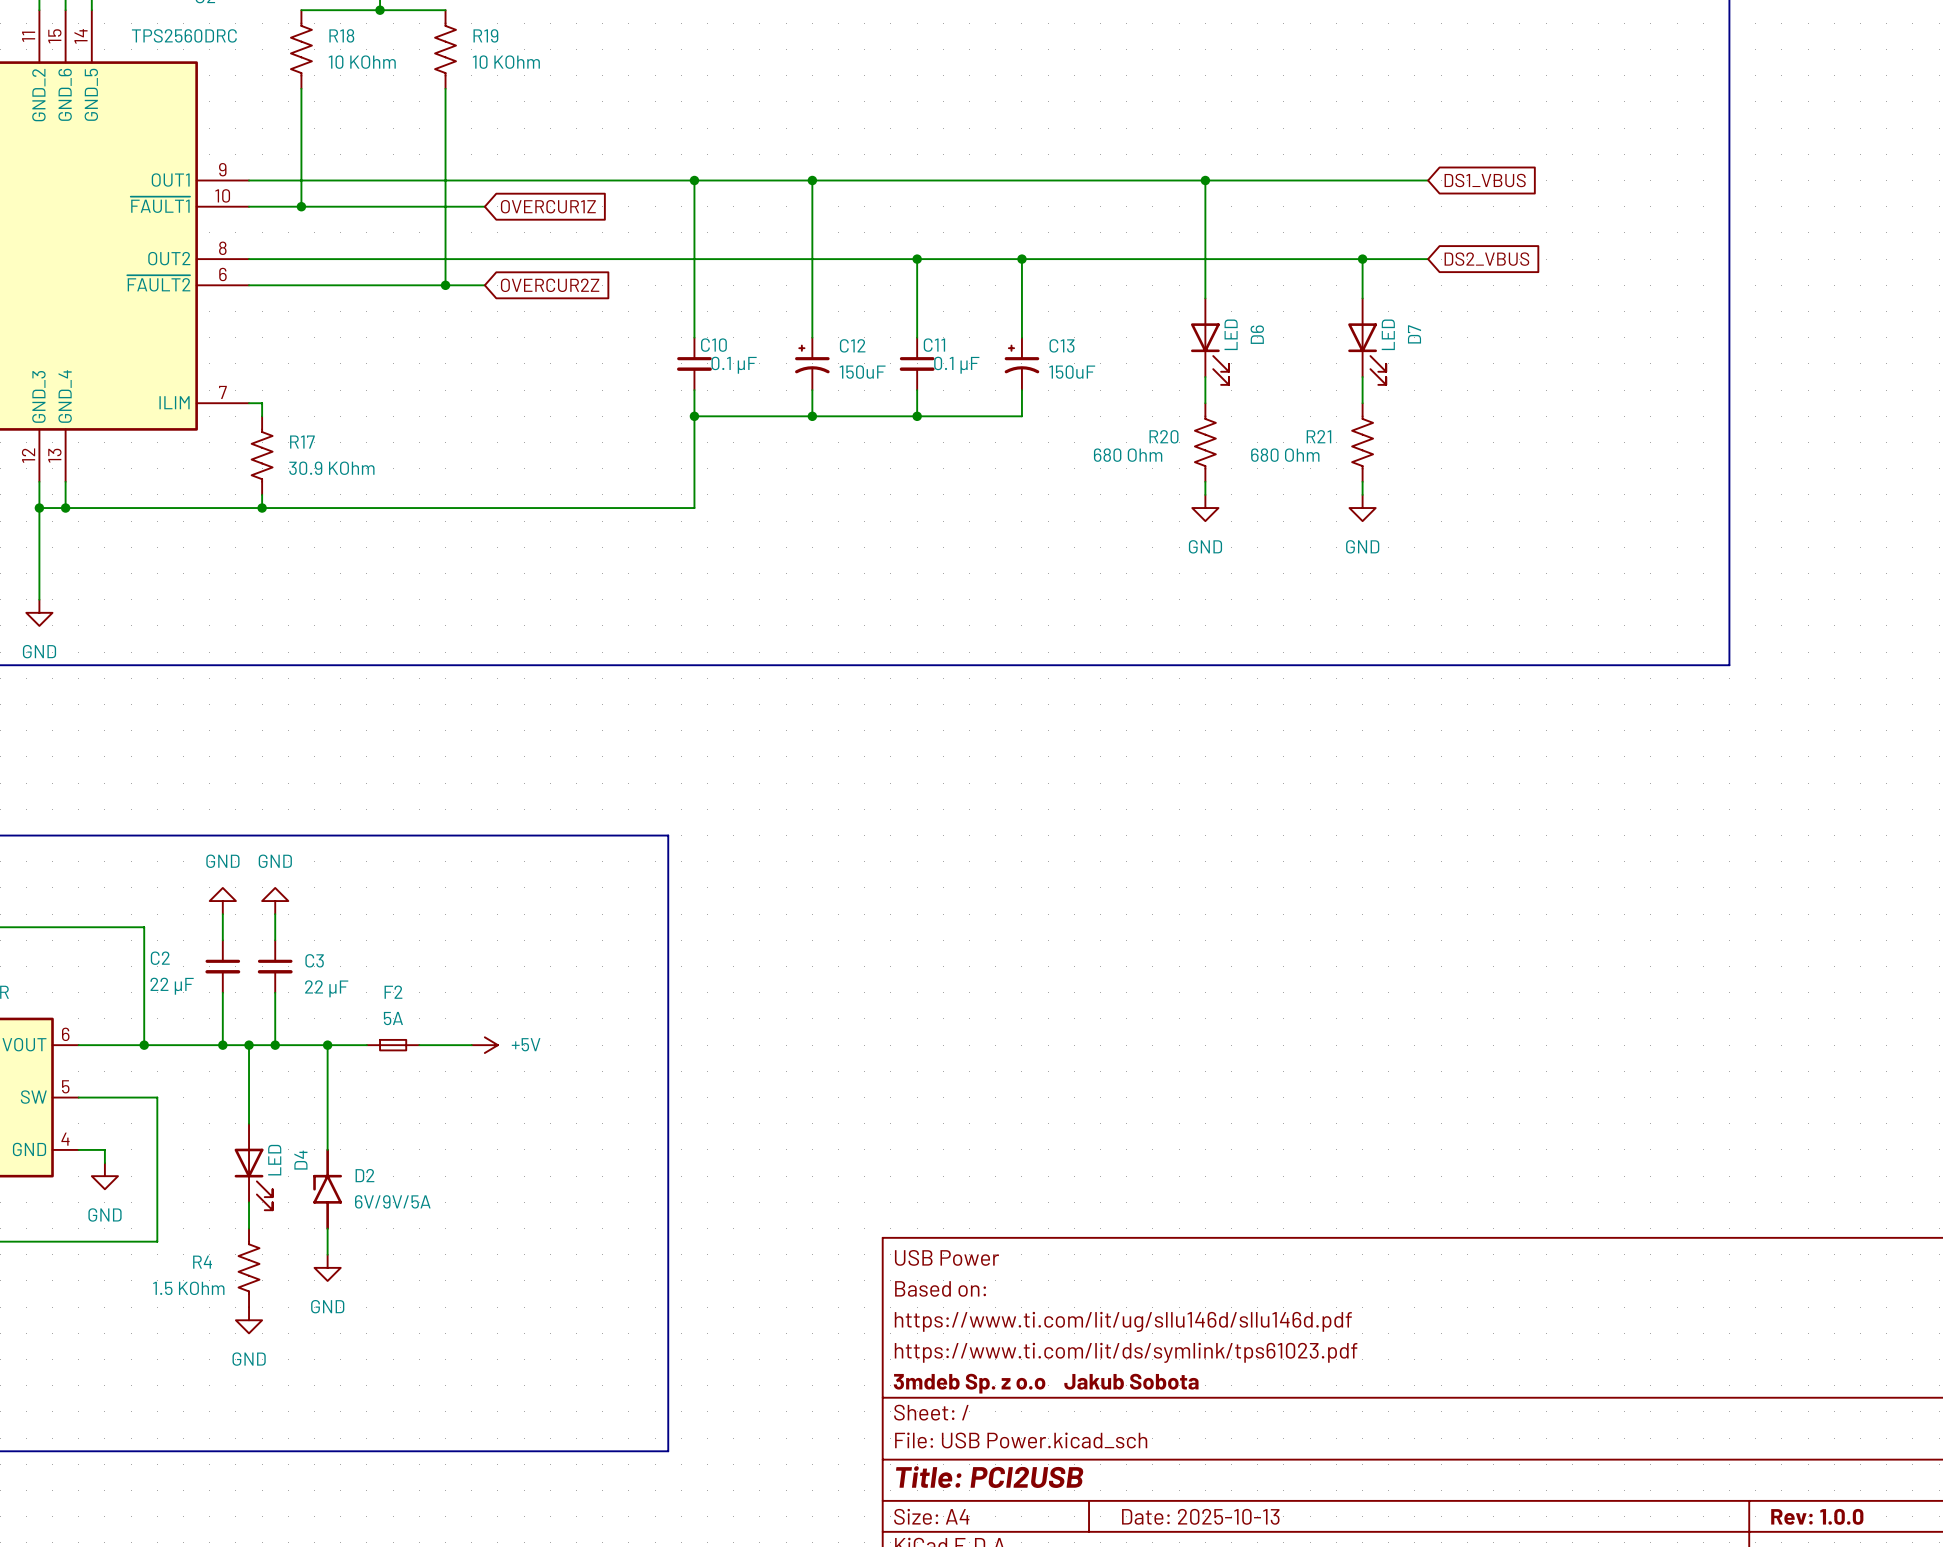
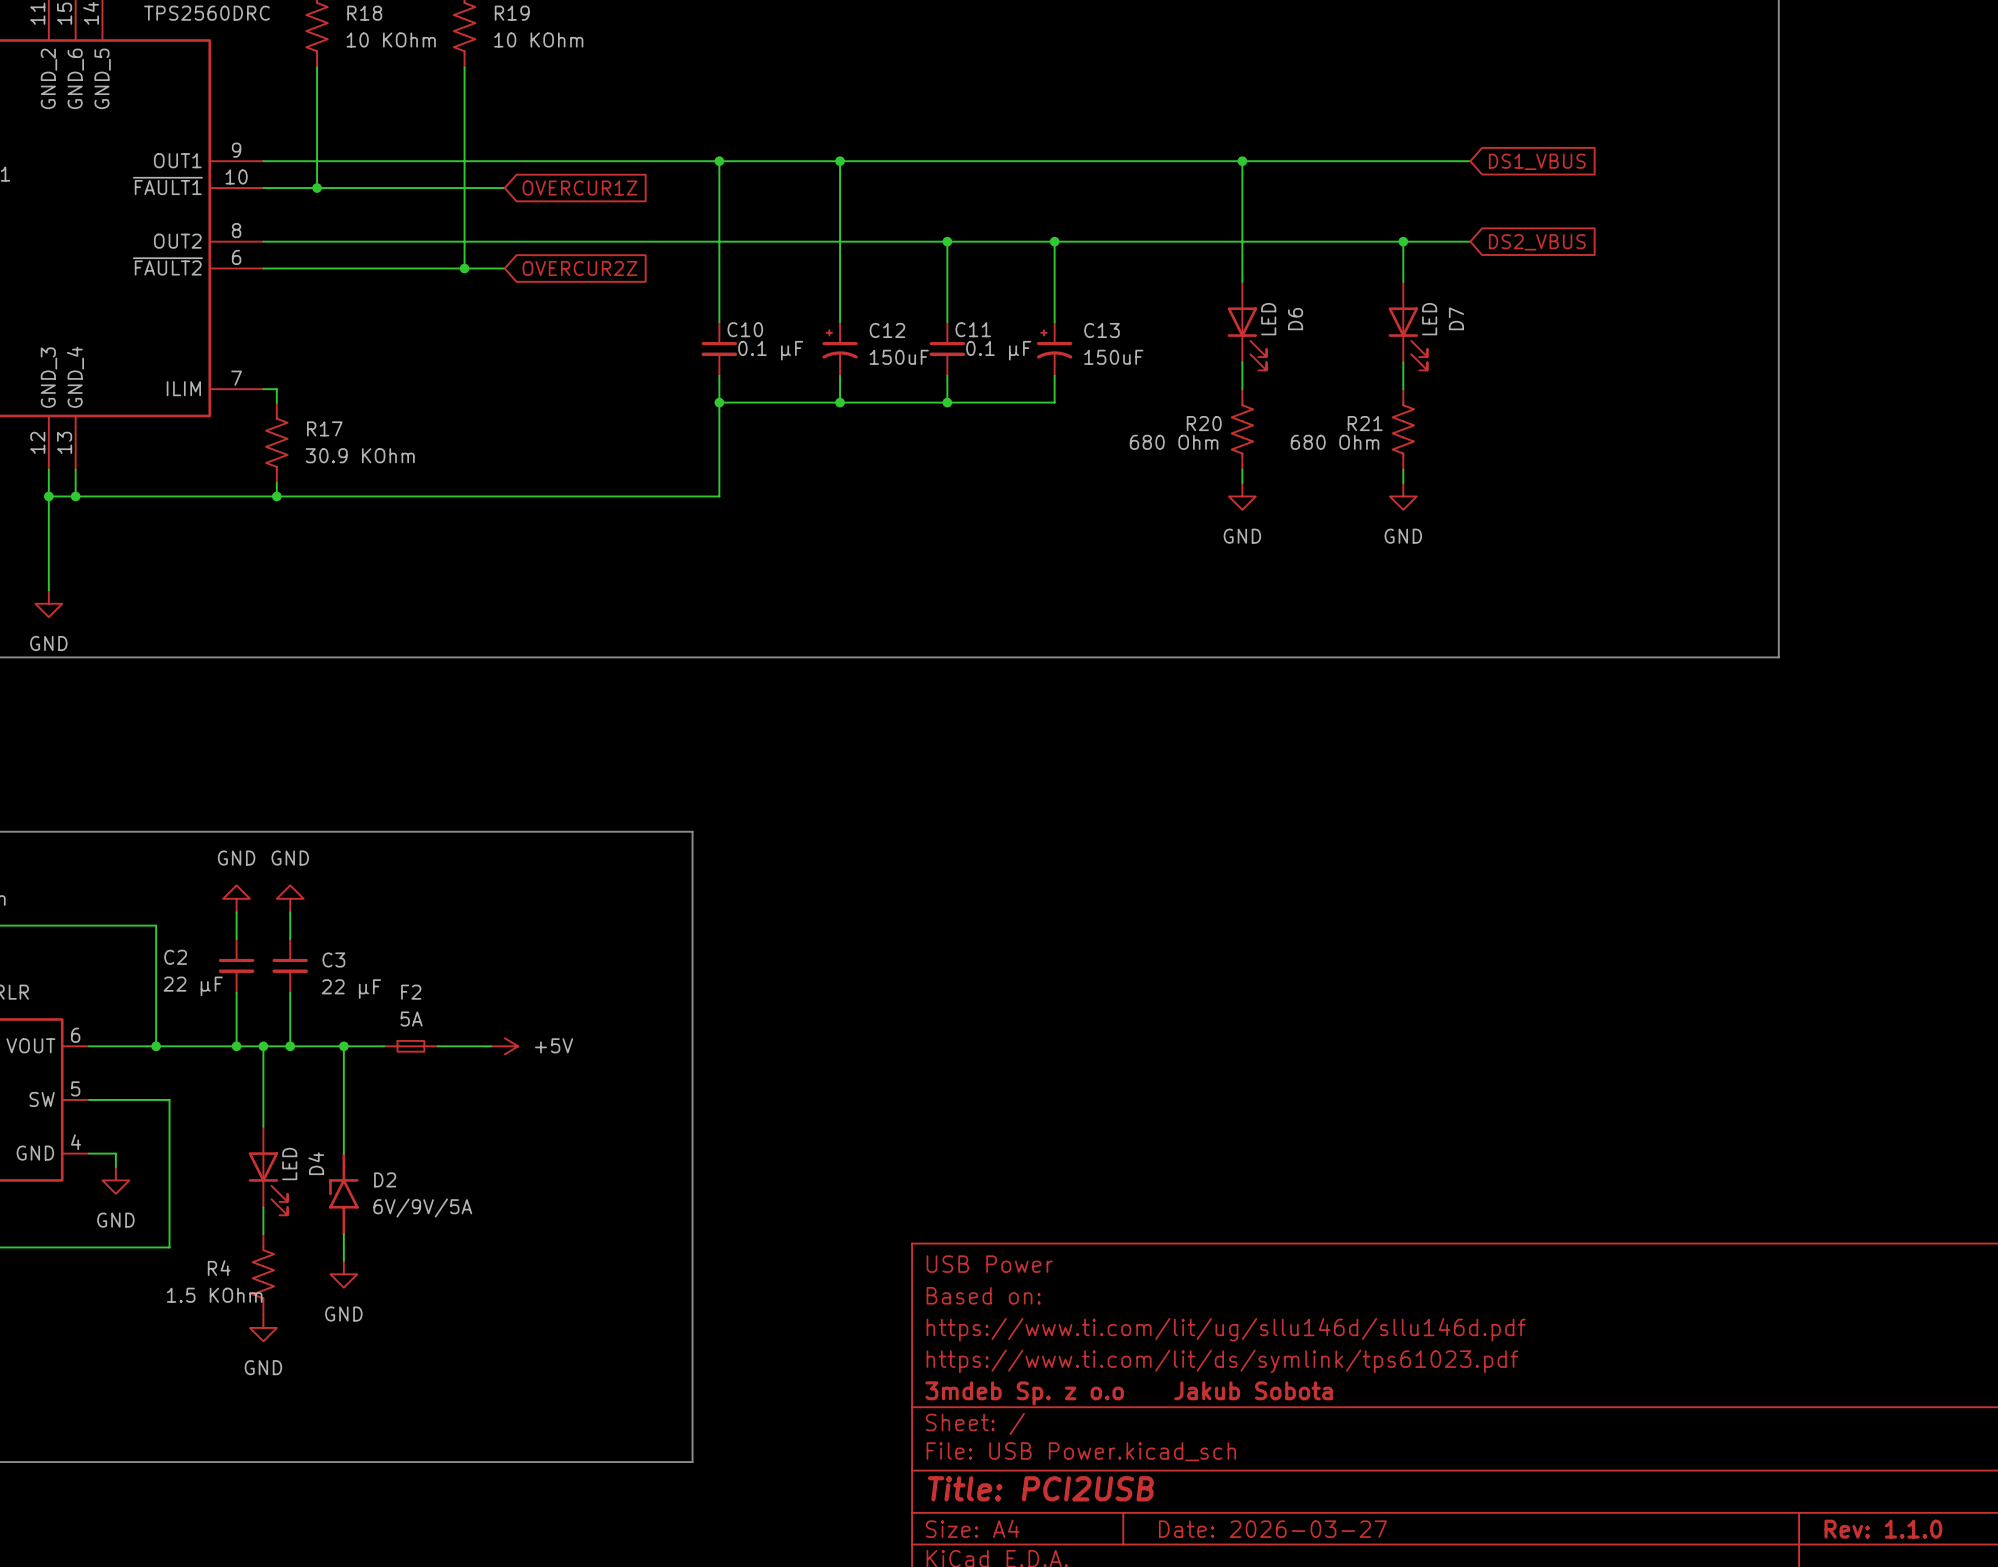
title block: Date: 2025-10-13 (1200, 1516) -> Date: 2026-03-27 (1272, 1529)
title block: Rev: 1.0.0 (1817, 1516) -> Rev: 1.1.0 (1883, 1529)

